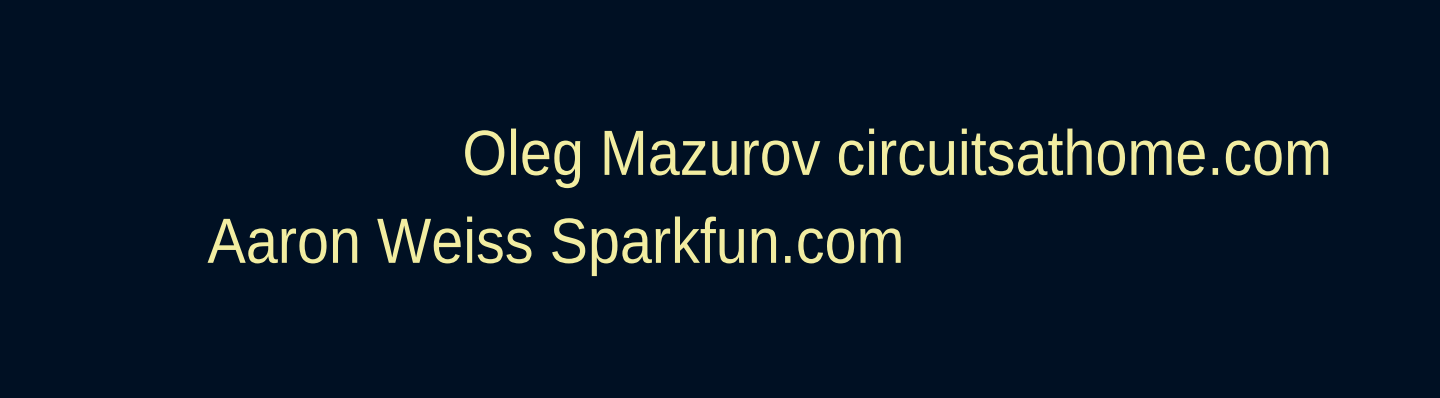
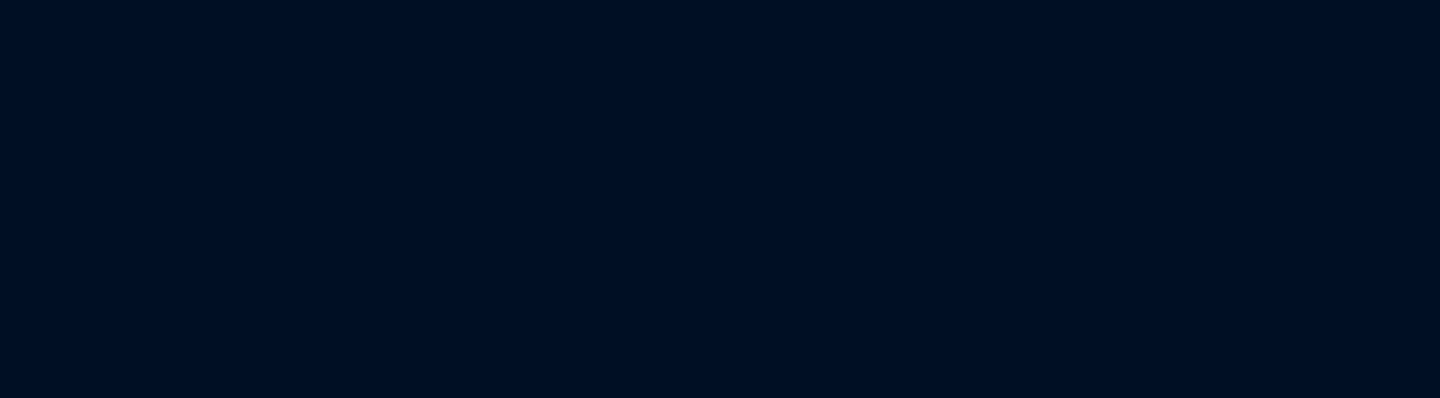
text: Oleg Mazurov circuitsathome.com (896, 158) -> none
text: Aaron Weiss Sparkfun.com (554, 246) -> none

